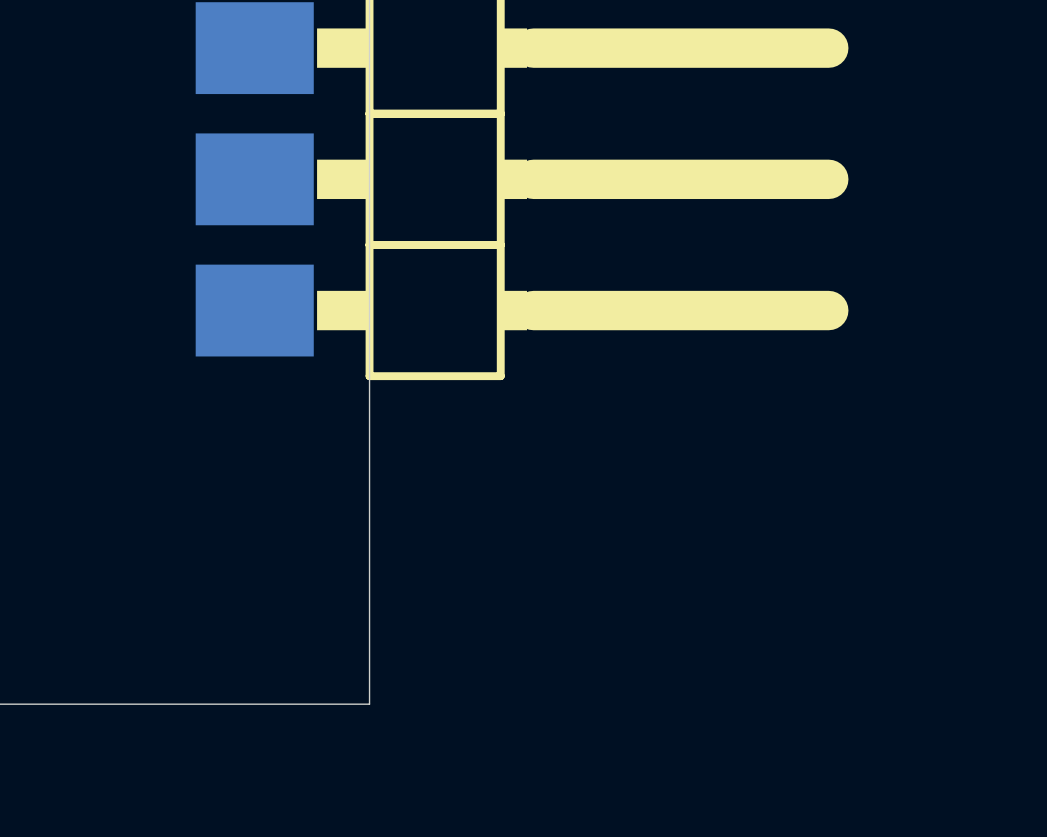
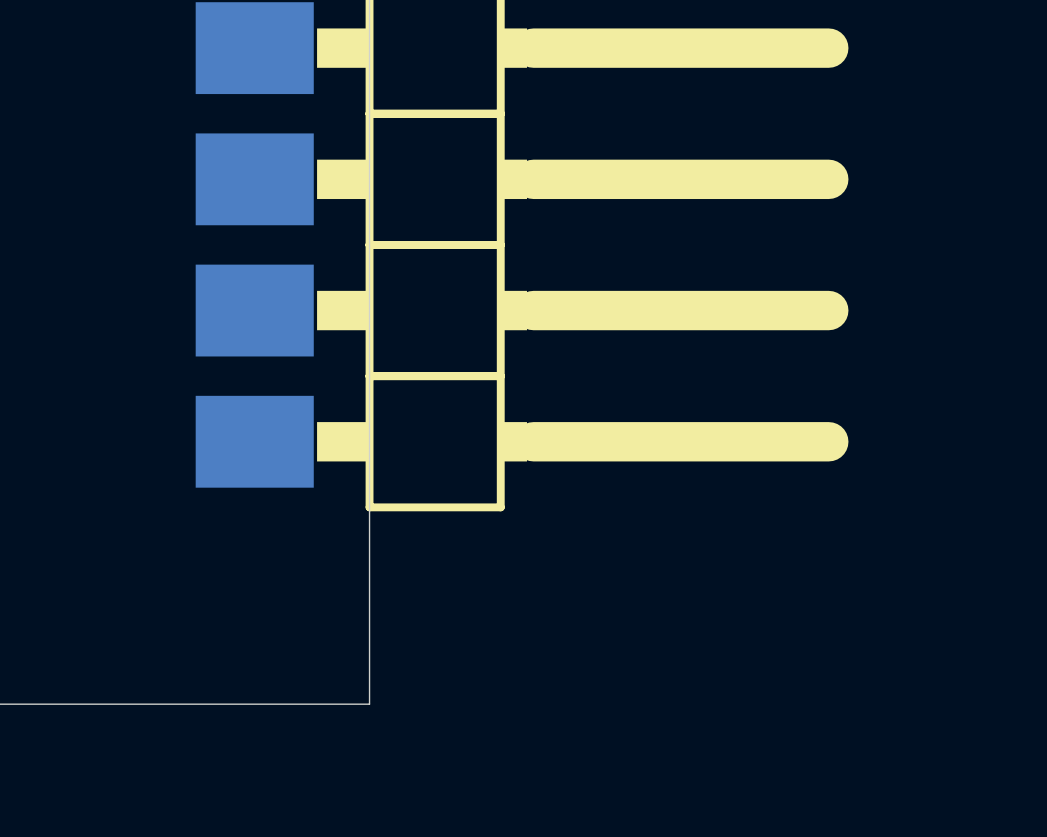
part: none -> (522, 441)

